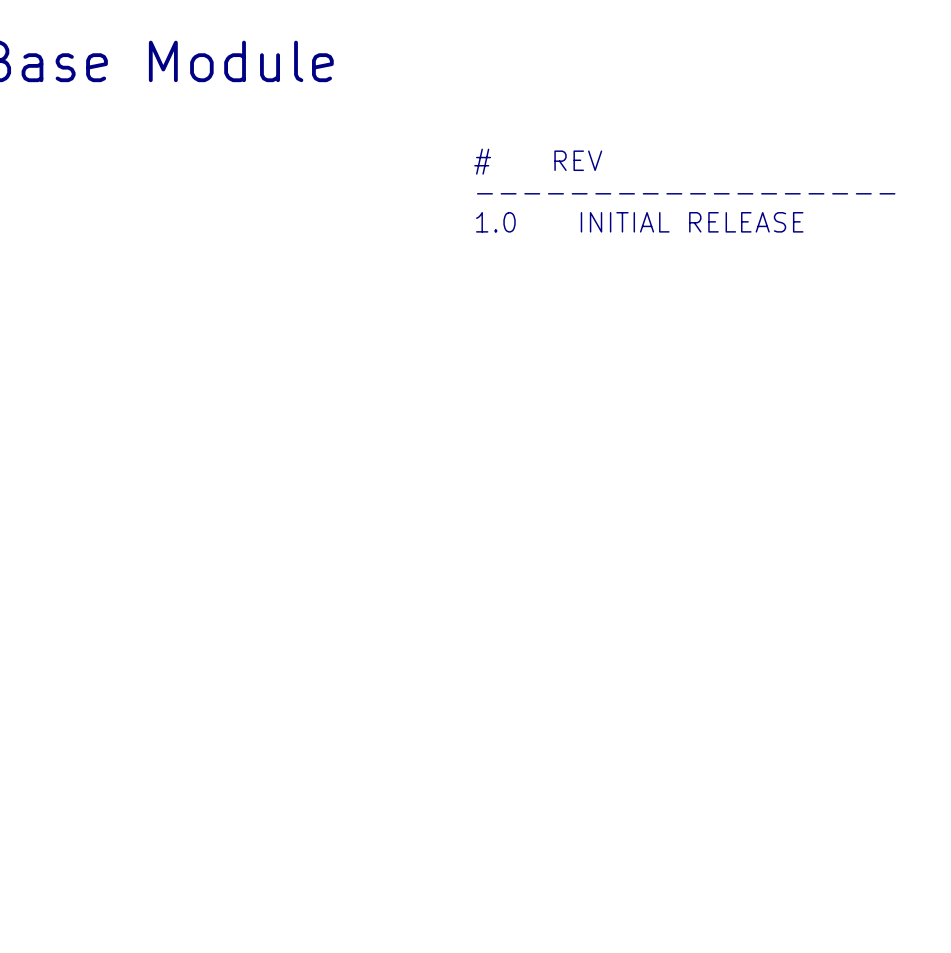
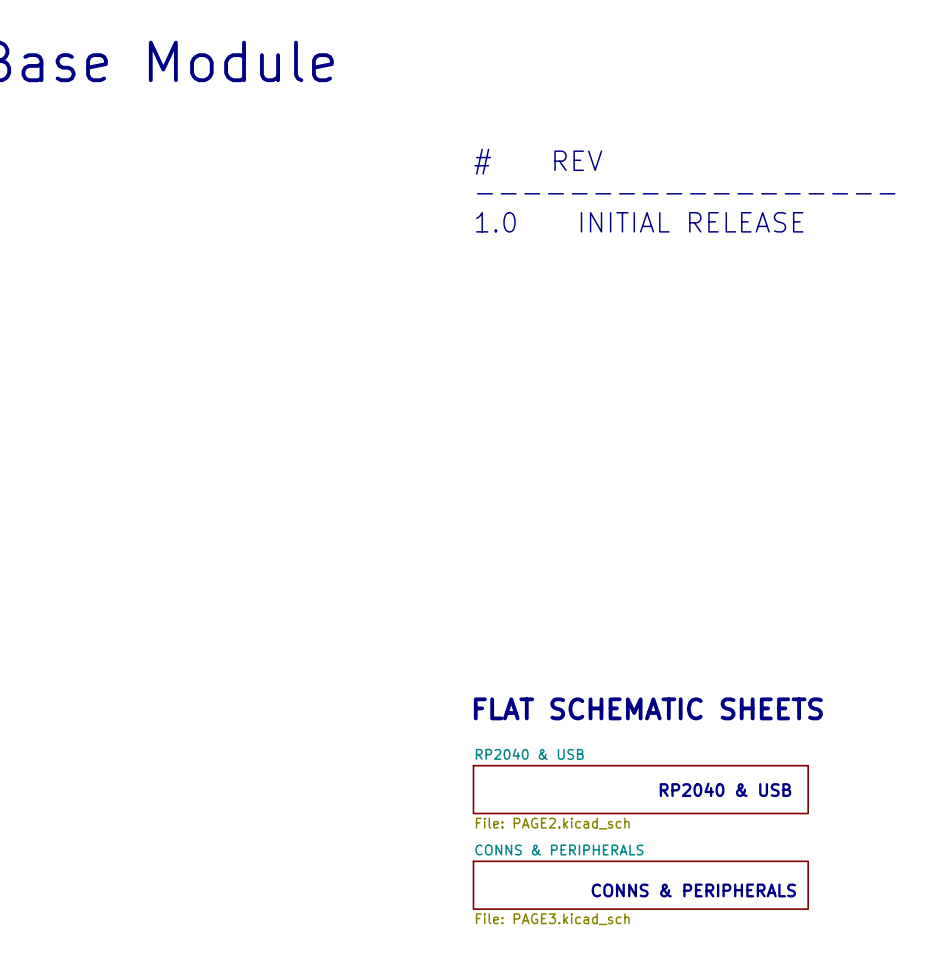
text: none -> FLAT SCHEMATIC SHEETS (648, 708)
sheet RP2040 & USB: none -> File: PAGE2.kicad_sch (640, 789)
text: none -> RP2040 & USB (725, 789)
sheet CONNS & PERIPHERALS: none -> File: PAGE3.kicad_sch (640, 885)
text: none -> CONNS & PERIPHERALS (693, 890)

